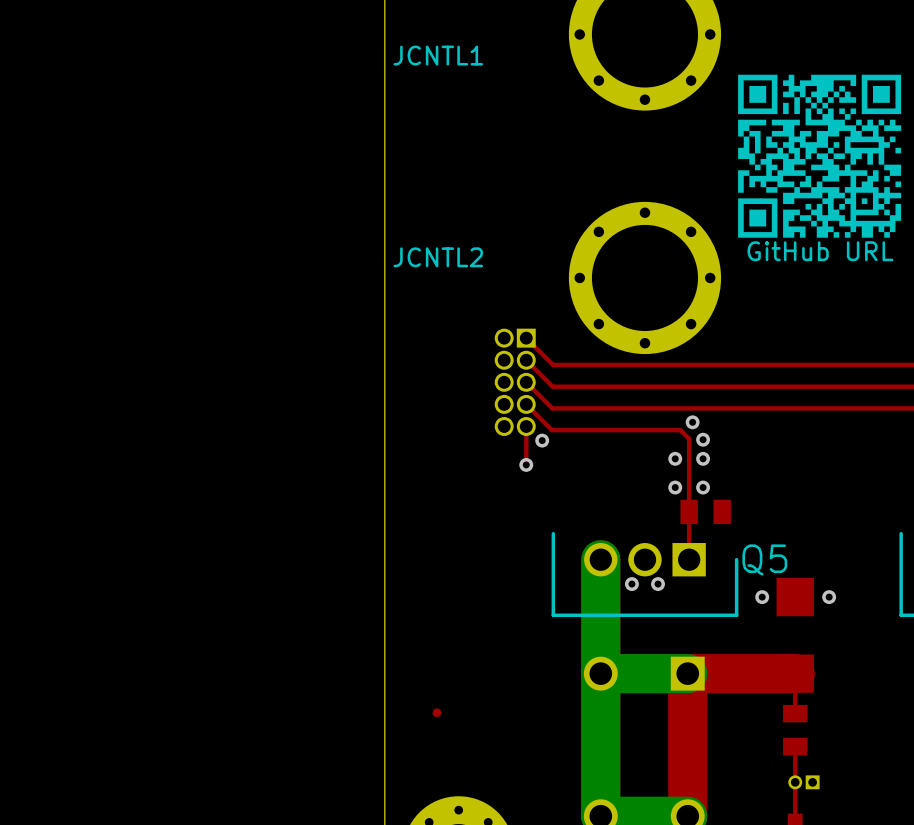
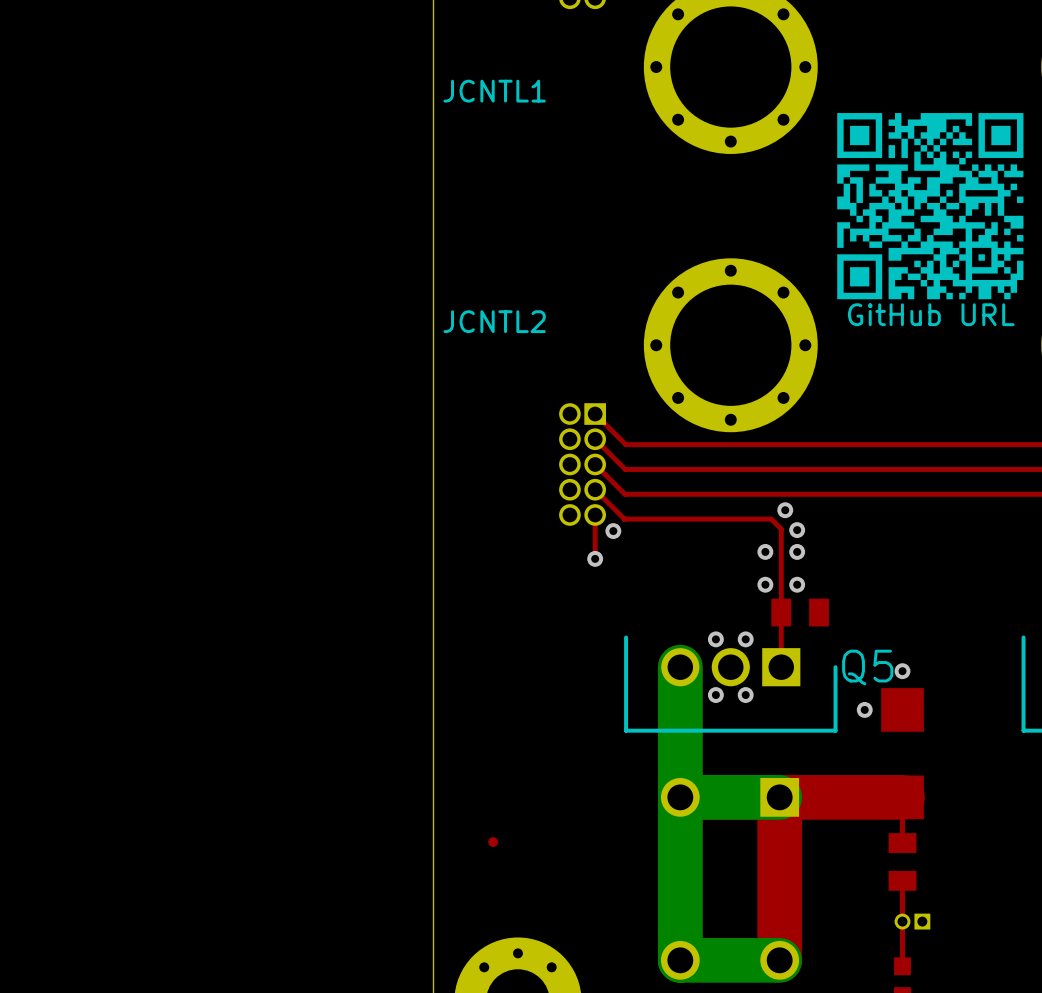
via: none -> (715, 639)
via: none -> (745, 639)
via position: (829, 597) -> (902, 671)

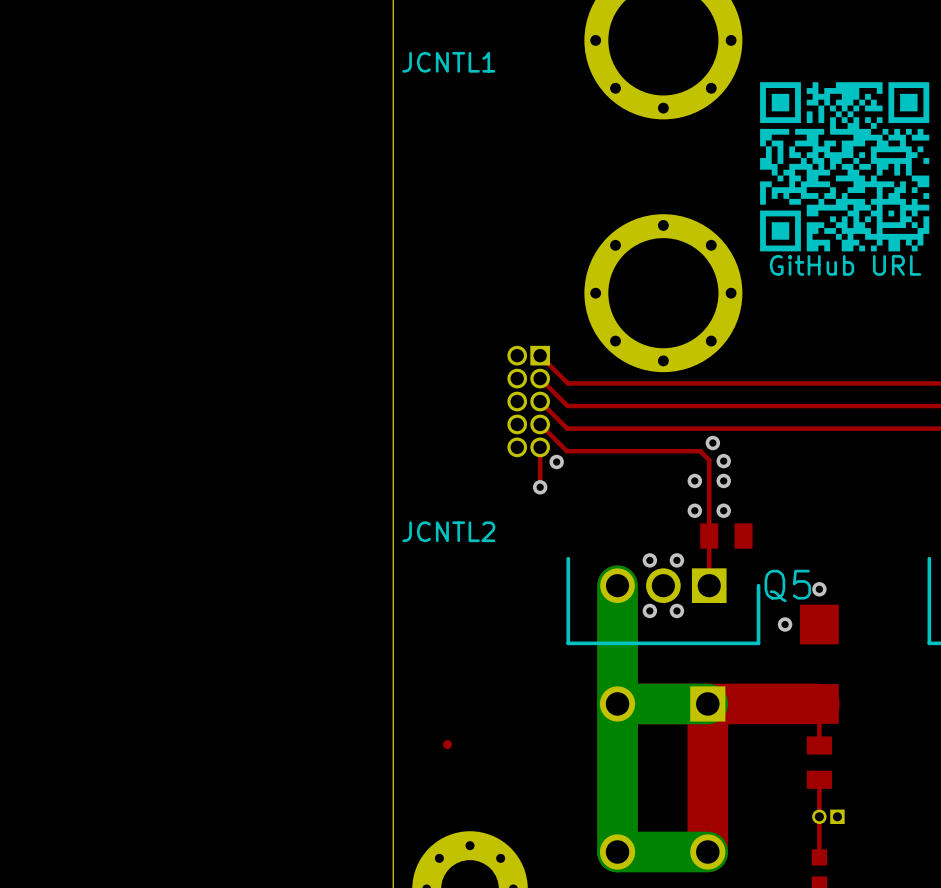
JCNTL2 name position: JCNTL2 (494, 321) -> JCNTL2 (448, 531)

